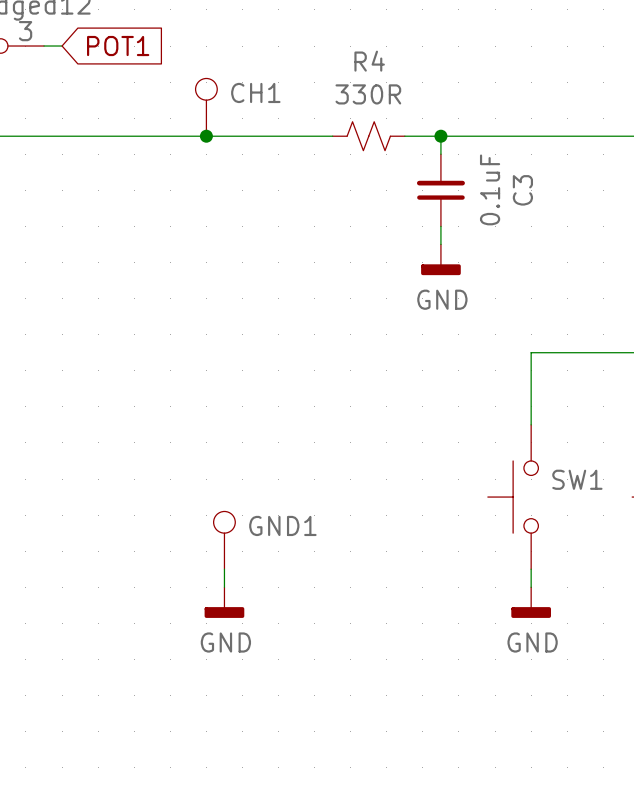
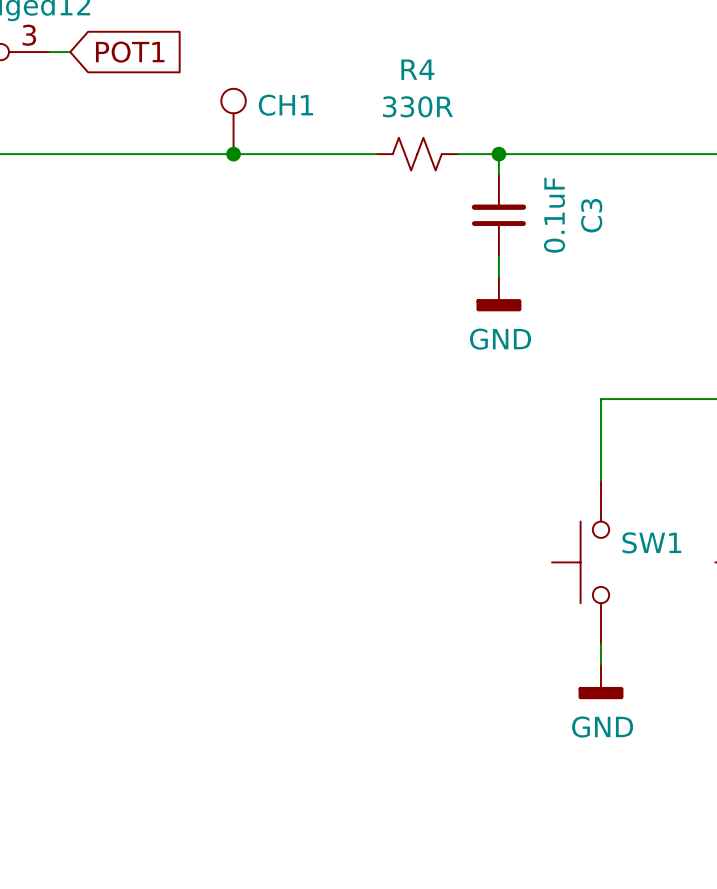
GND1: (224, 540) -> none
wire: (224, 569) (224, 587) -> none
power symbol: GND (224, 602) -> none

